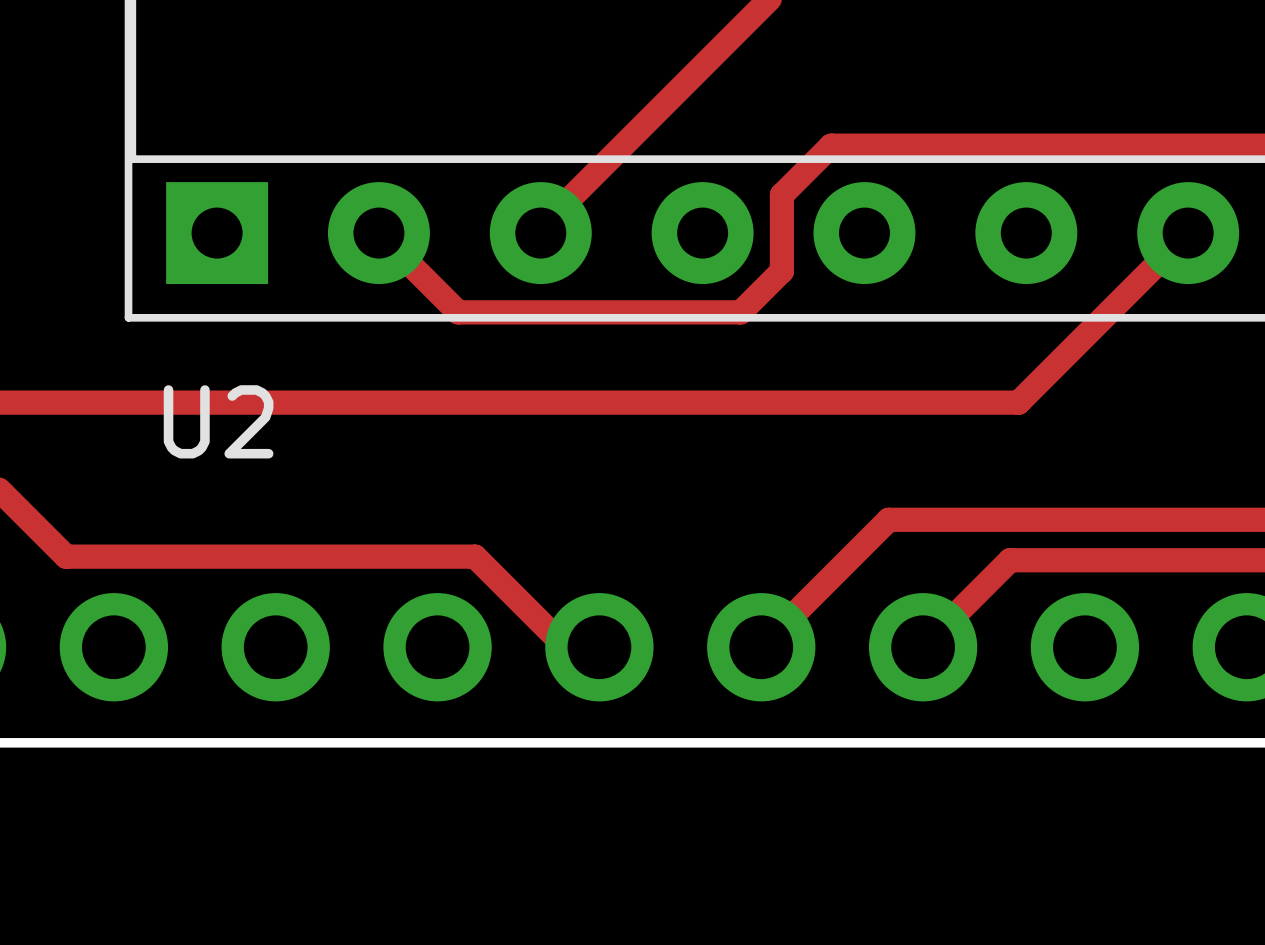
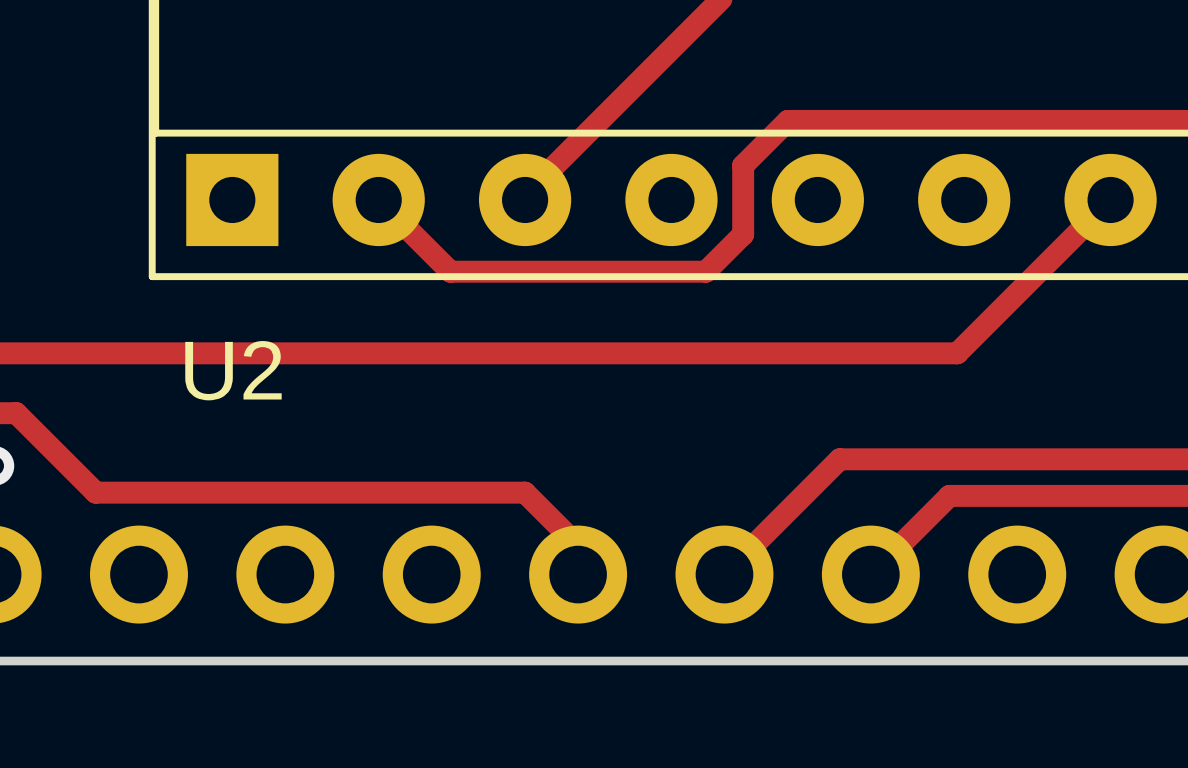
track: (475, 556) (565, 647) (599, 647) -> (465, 492) (524, 492) (578, 545) (578, 574)

